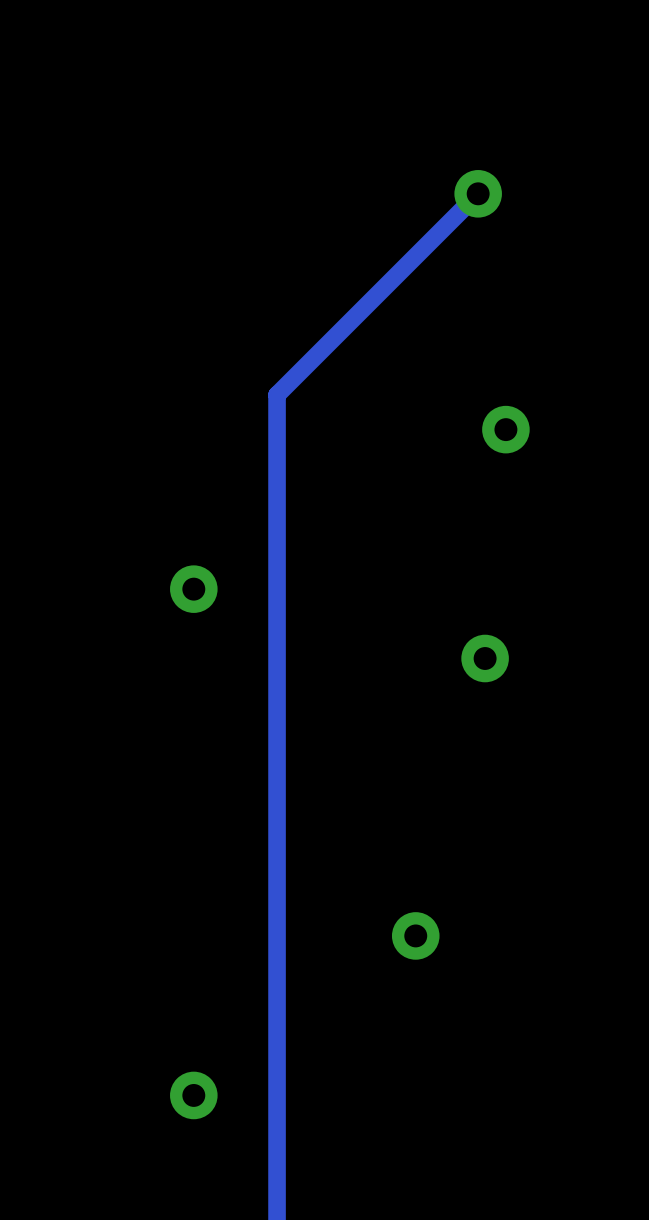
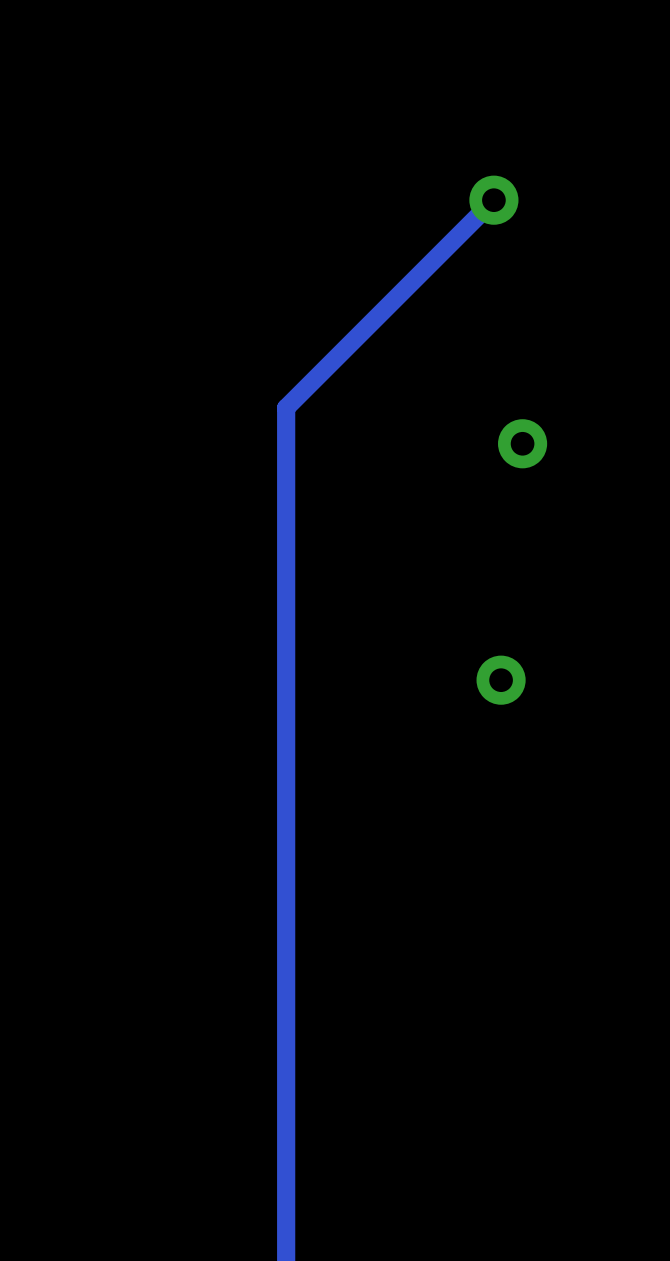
via: (193, 589) -> none
via: (415, 935) -> none
via: (193, 1095) -> none

